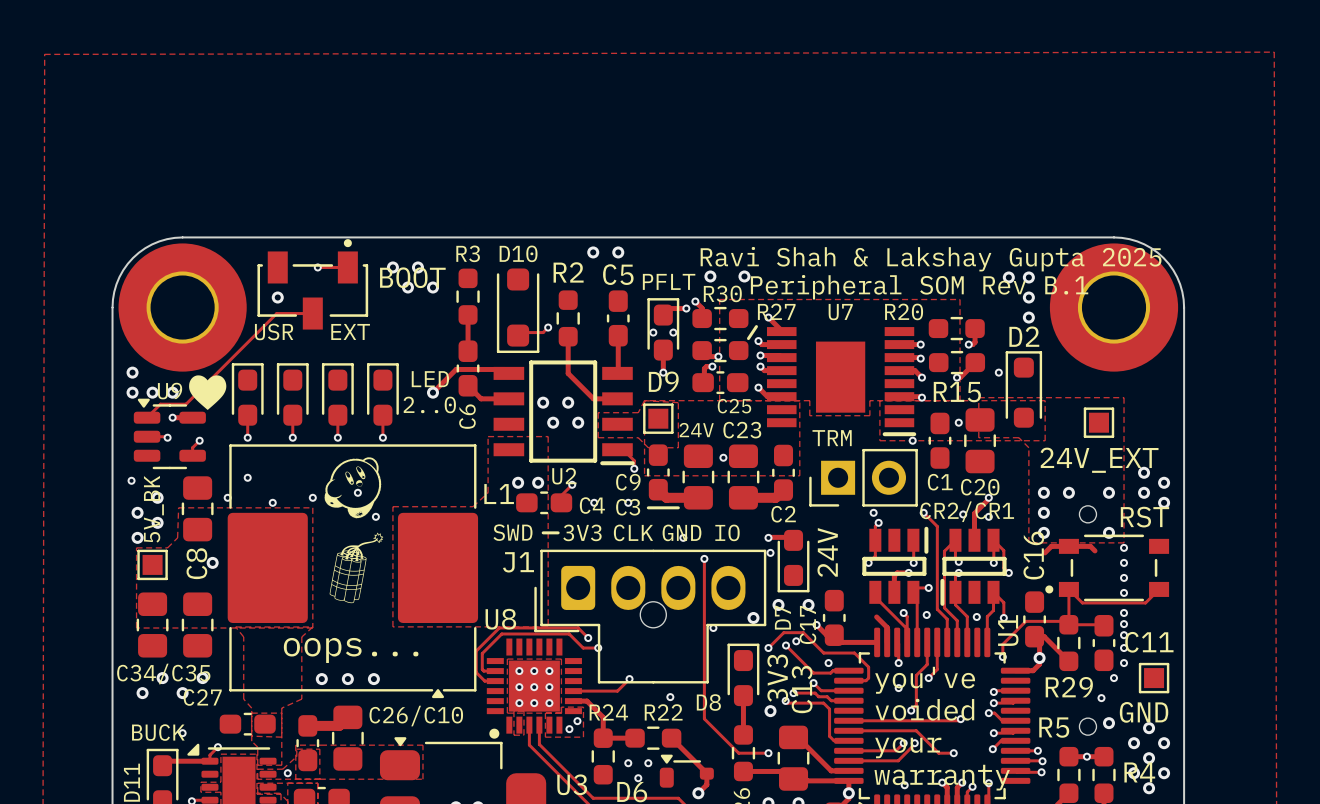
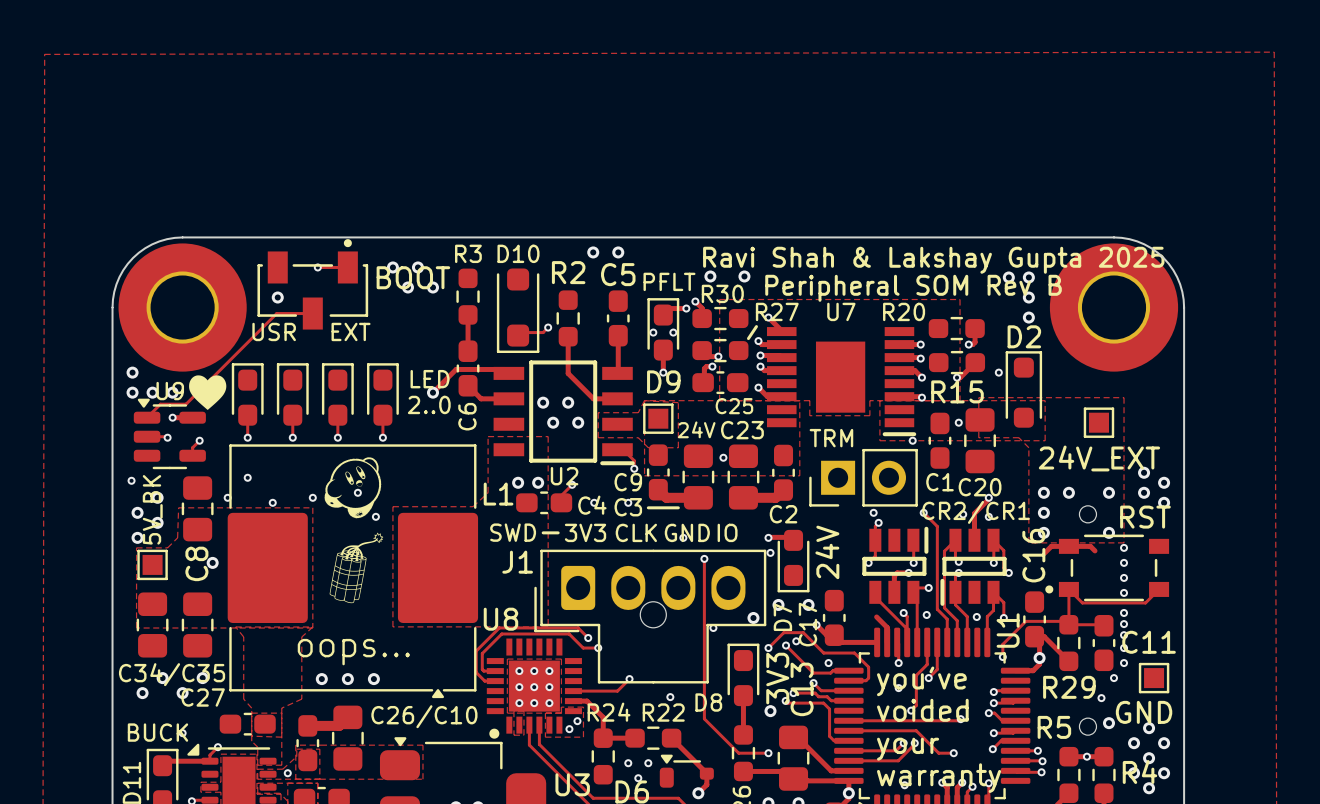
text: Peripheral SOM Rev B.1 (919, 287) -> Peripheral SOM Rev B (913, 288)

